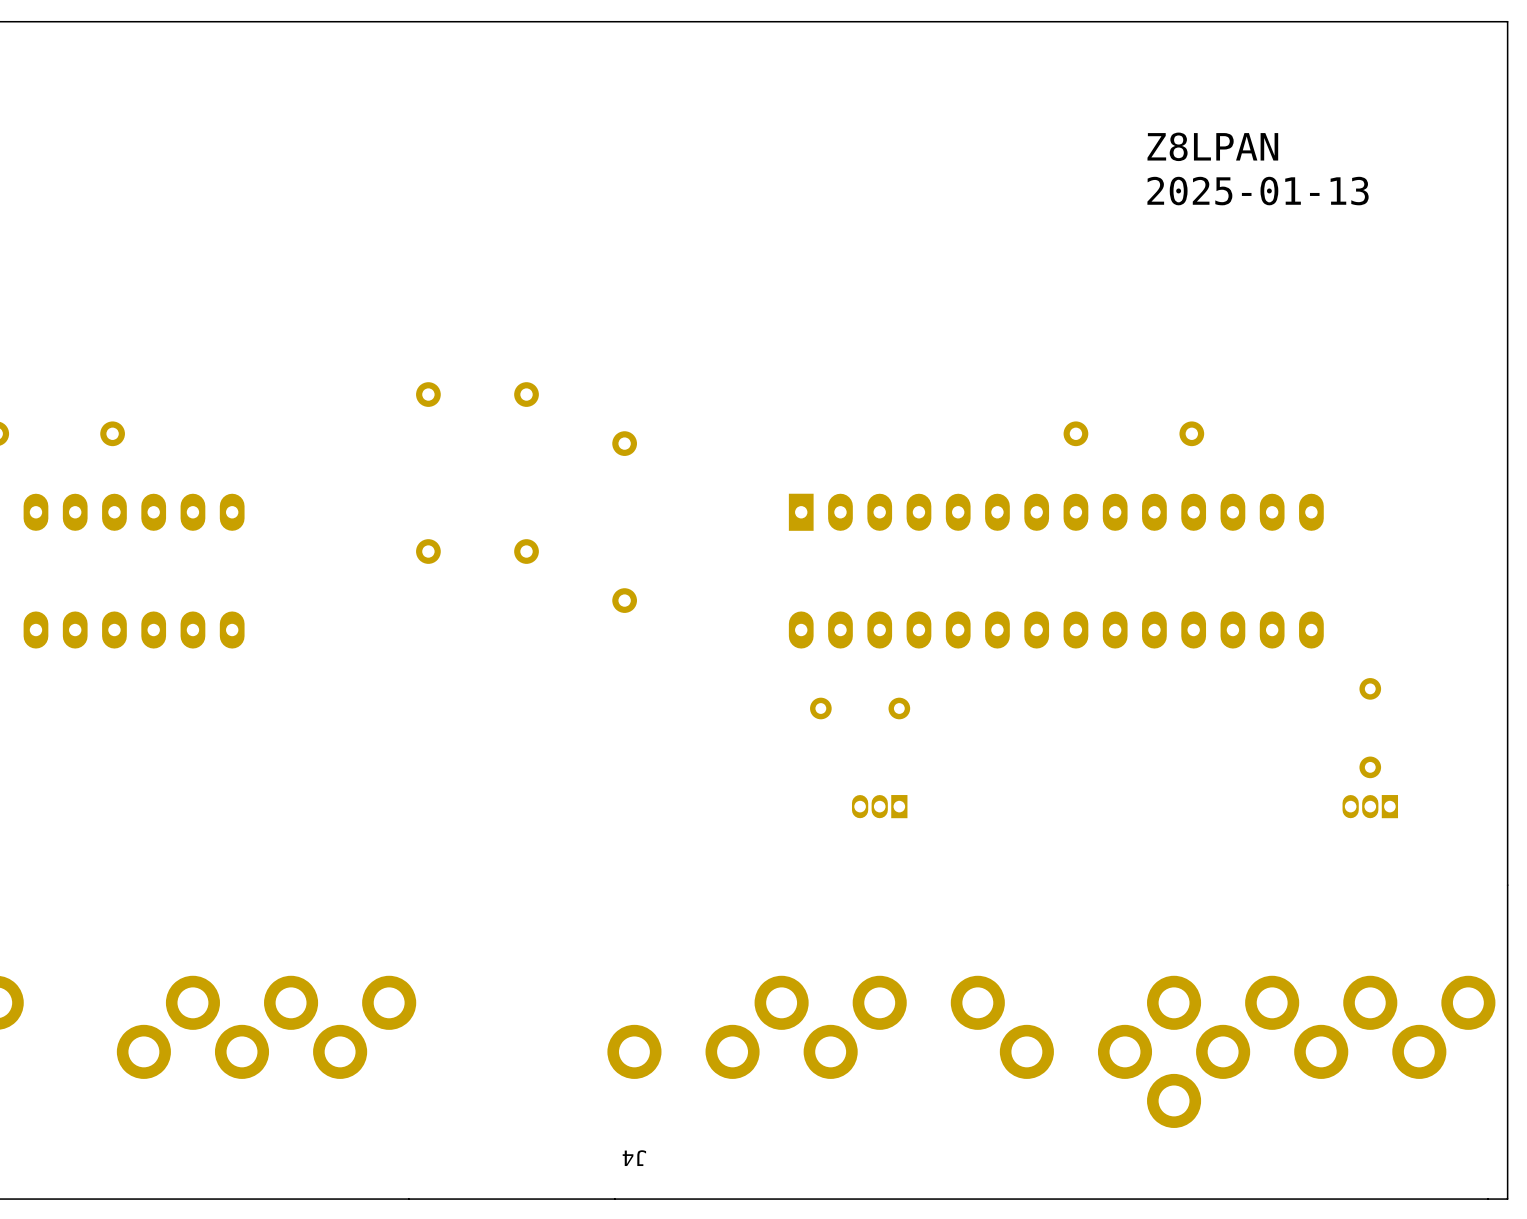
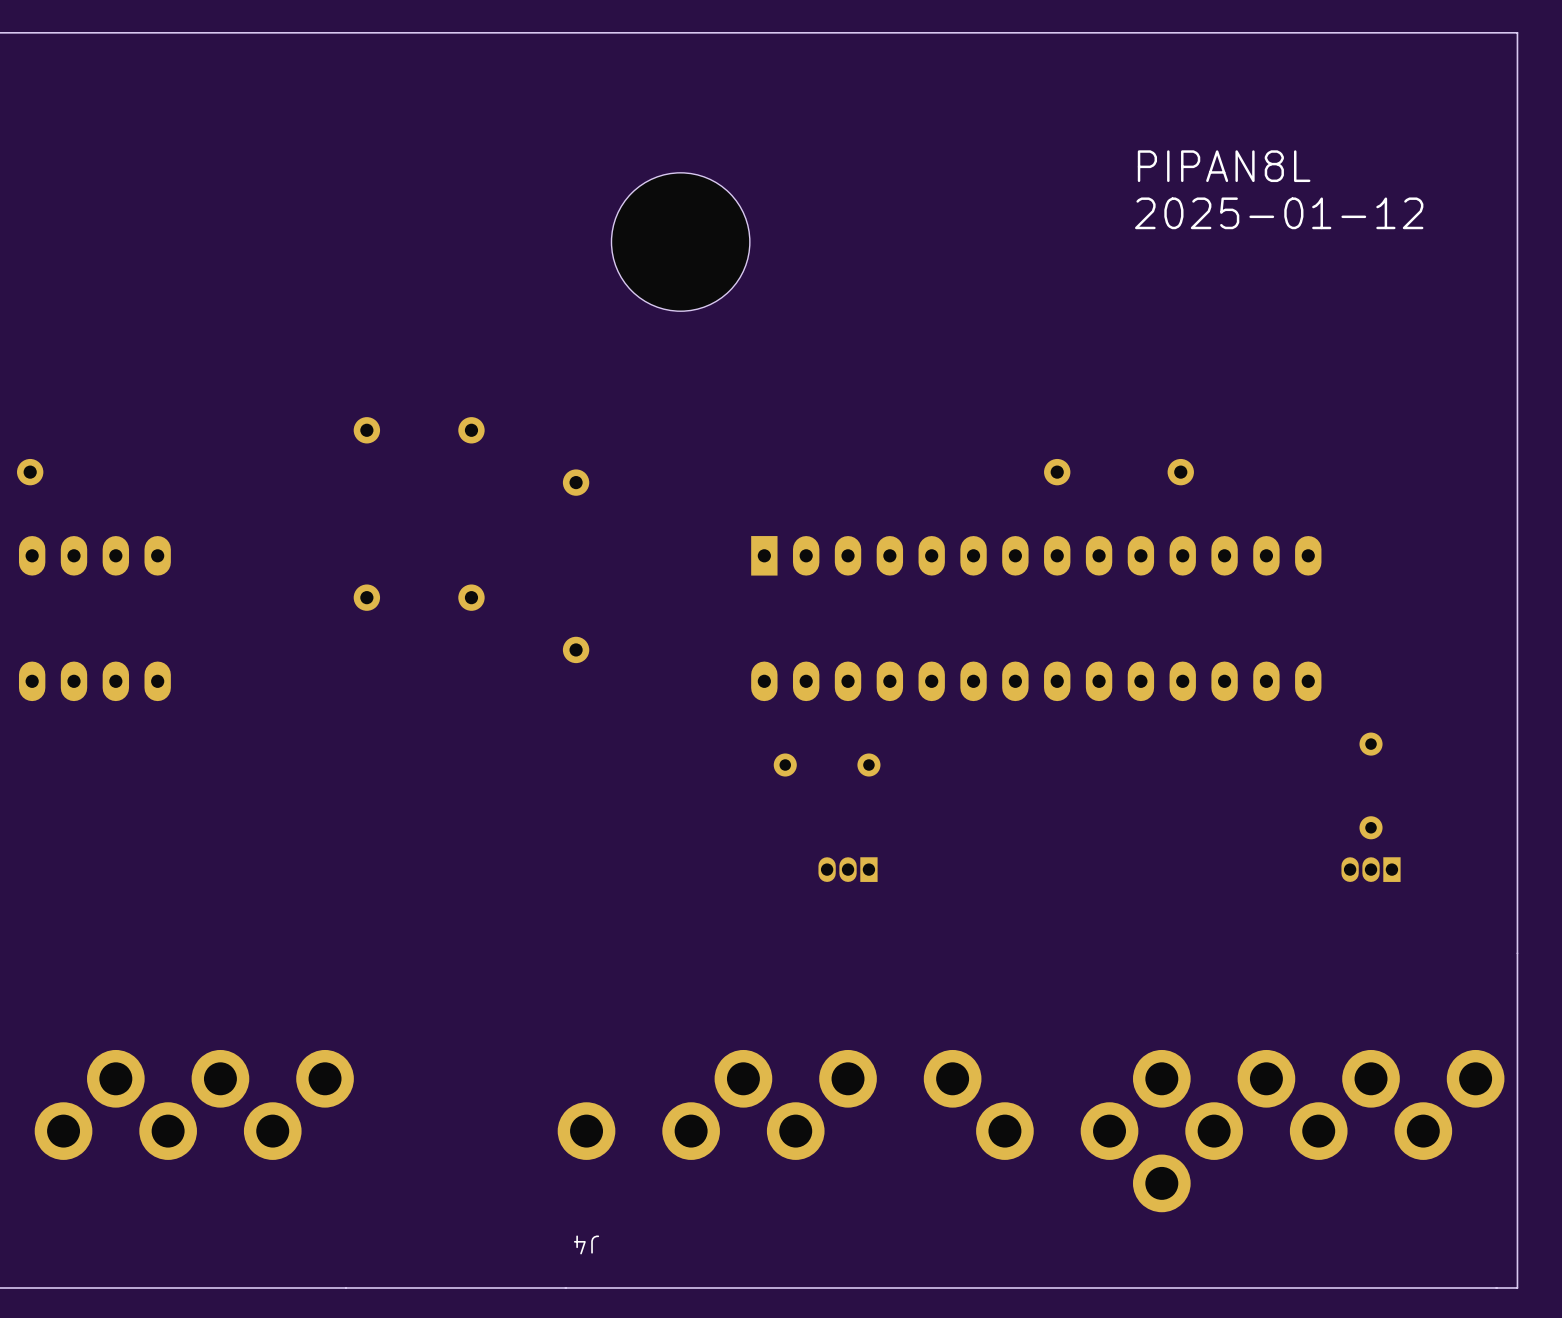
text: Z8LPAN (1212, 146) -> PIPAN8L (1224, 166)
text: 2025-01-13 (1258, 191) -> 2025-01-12 (1279, 213)
part: none -> (680, 242)

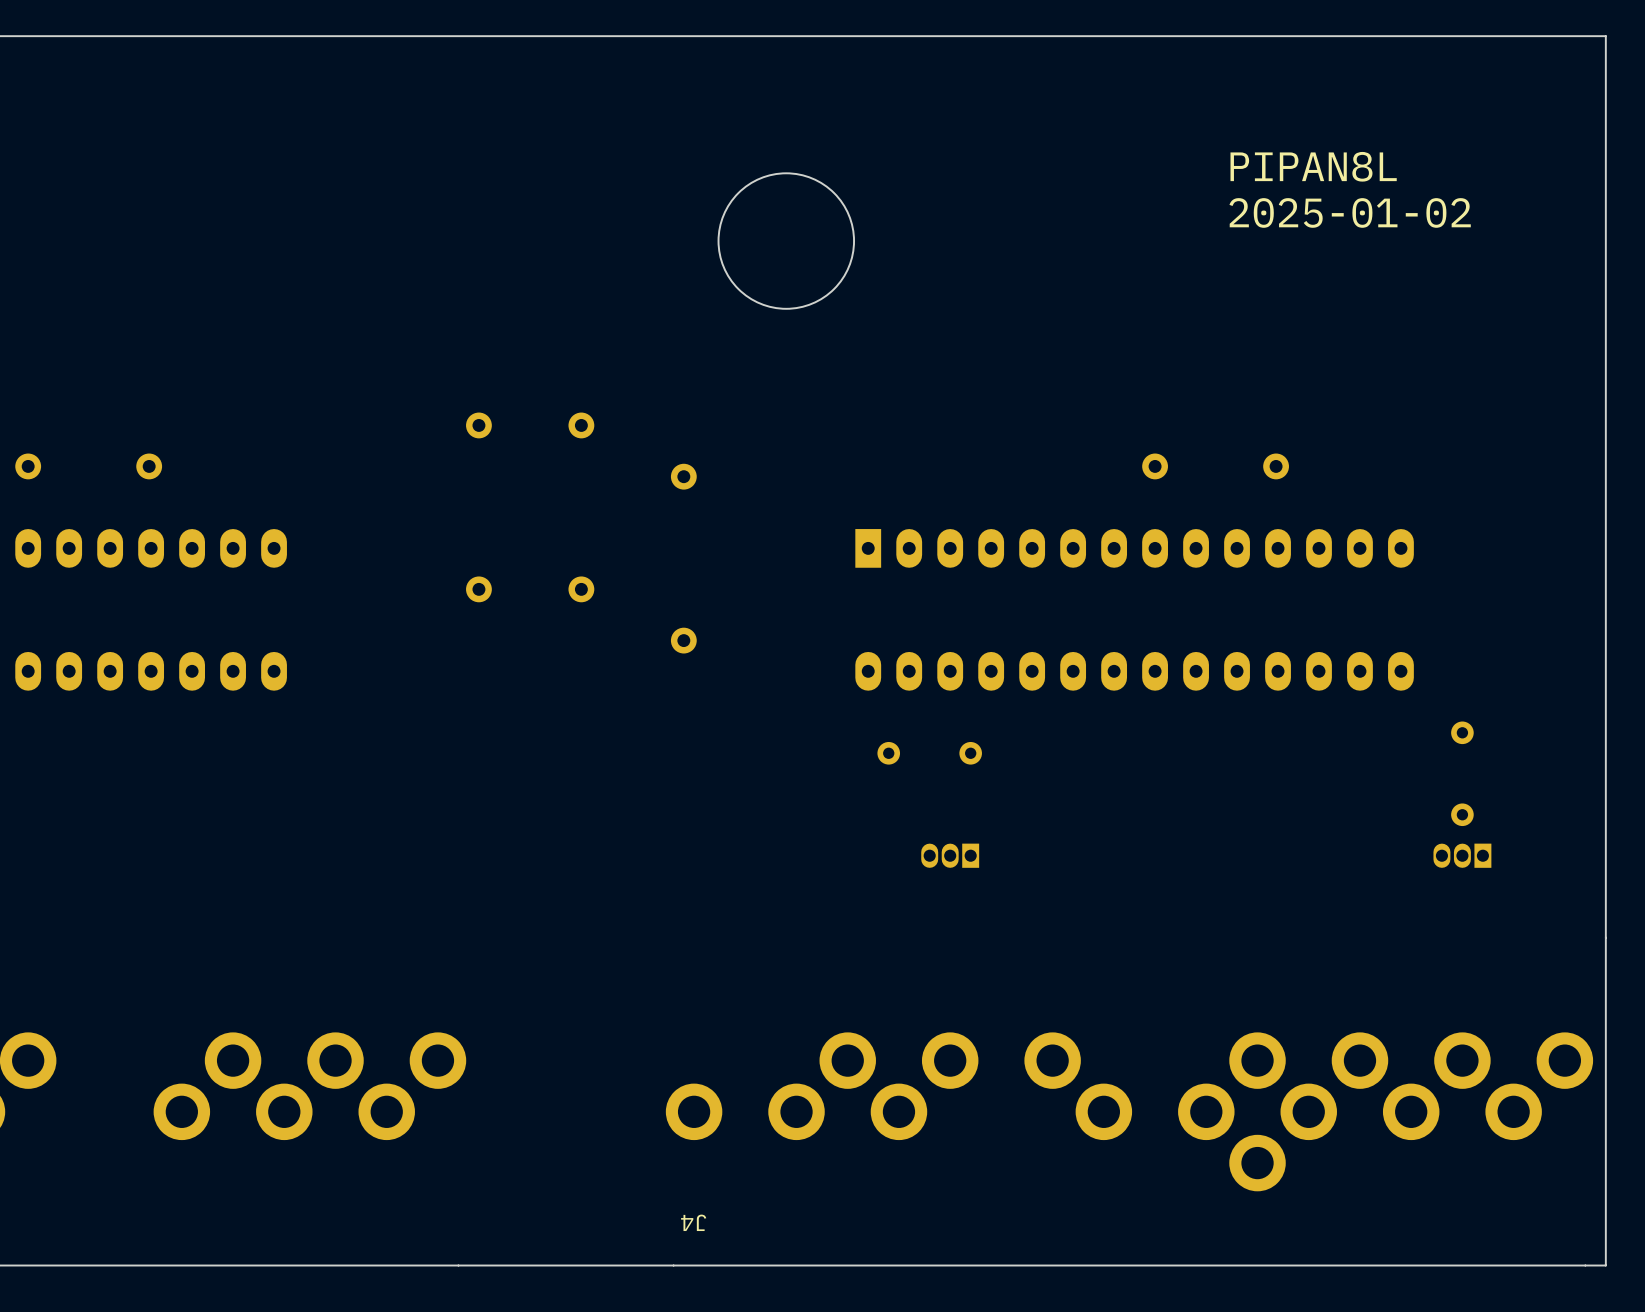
text: 2025-01-12 (1279, 213) -> 2025-01-02 (1350, 212)

